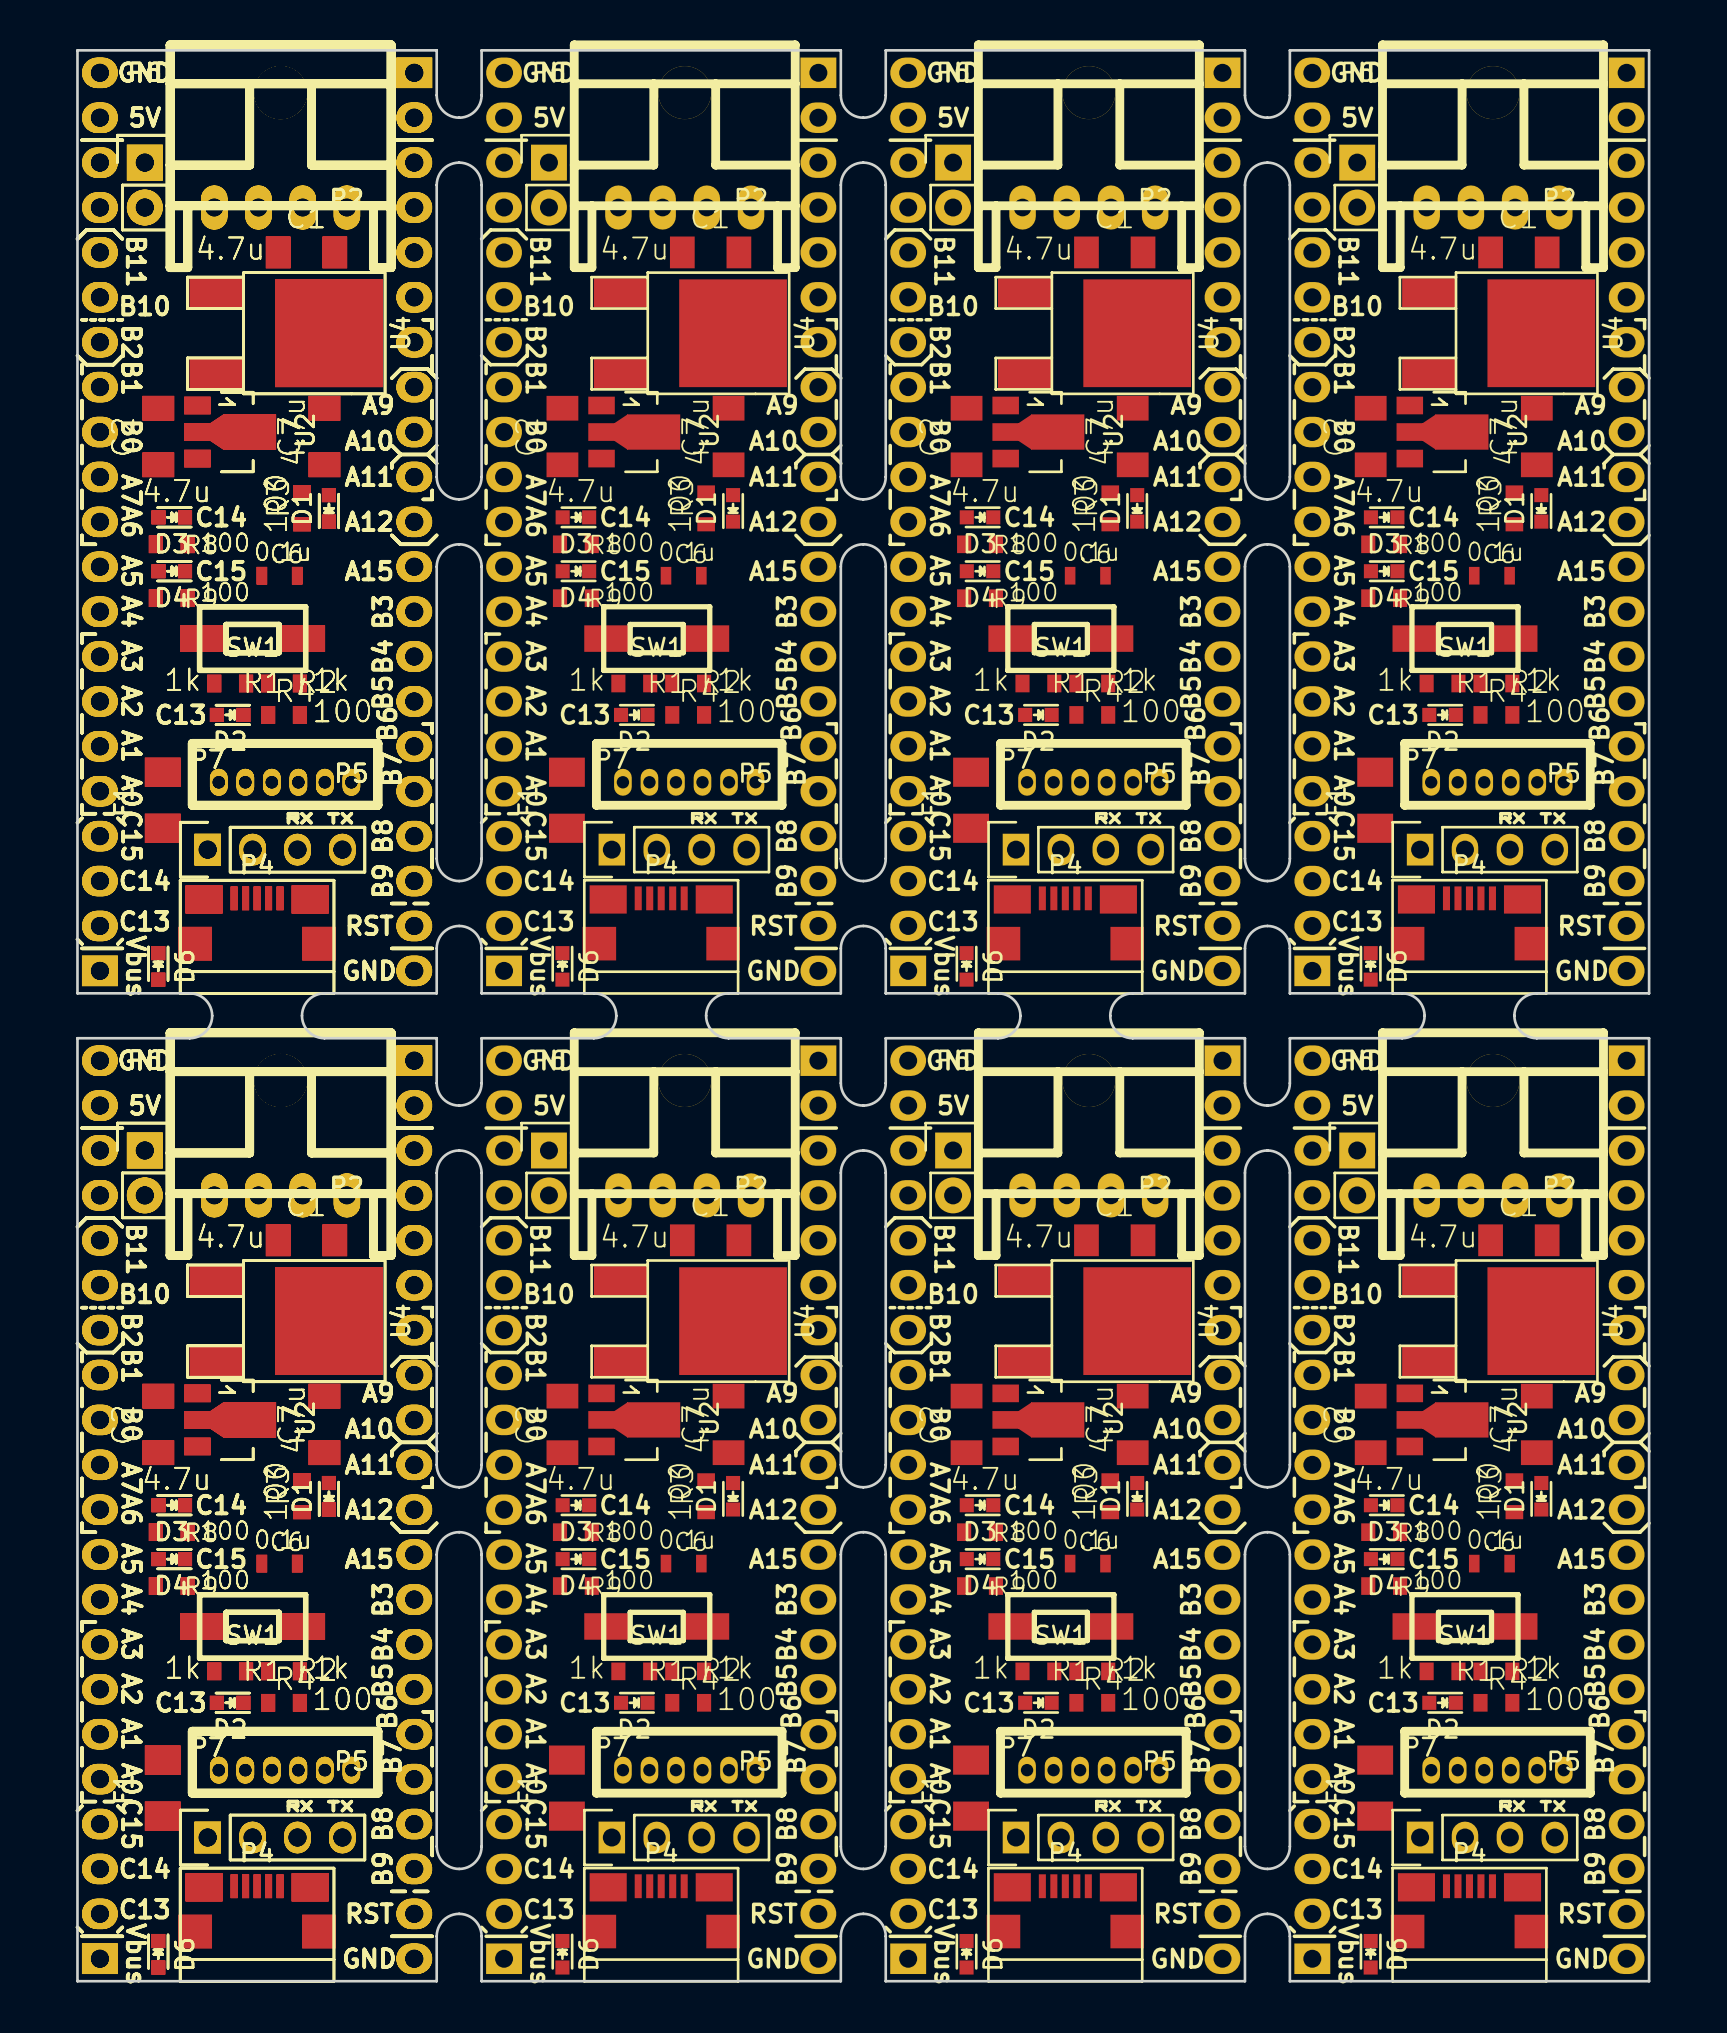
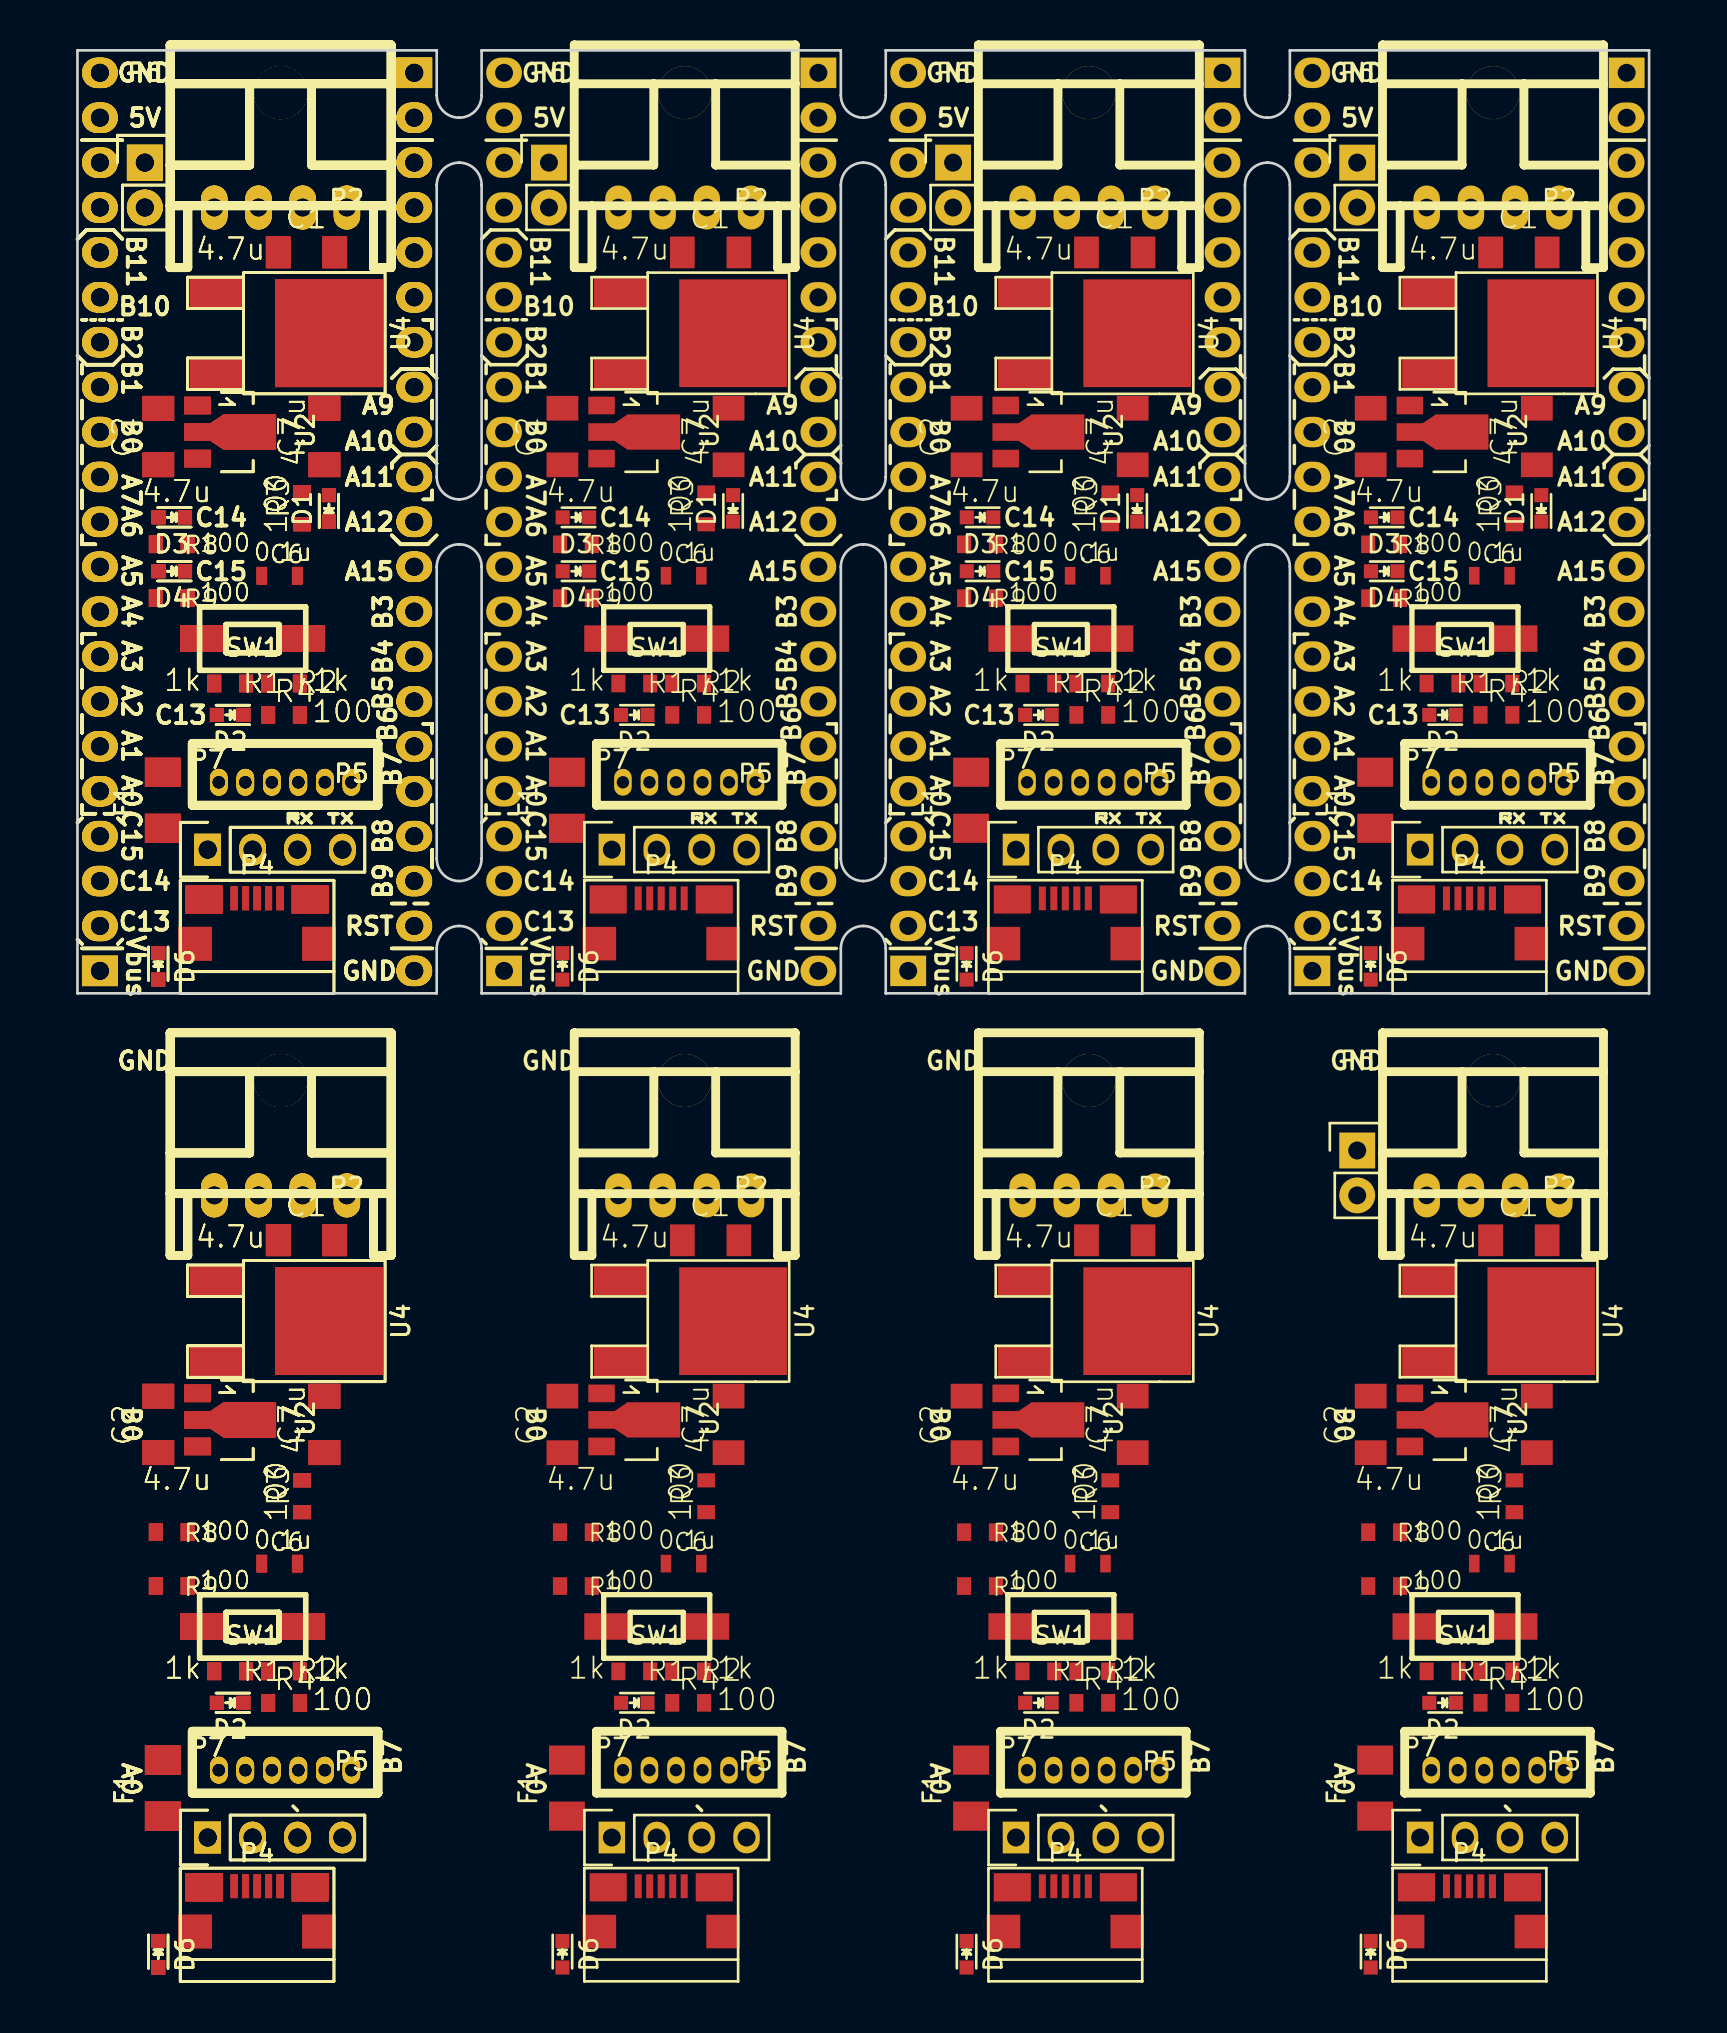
board edge: (189, 993) (203, 997) (211, 1009) (211, 1018) (209, 1027) (198, 1036) (189, 1038) (77, 1038) (77, 1981) (436, 1981) (437, 1930) (445, 1918) (459, 1913) (472, 1918) (480, 1930) (481, 1981) (840, 1981) (841, 1930) (849, 1918) (863, 1913) (876, 1918) (884, 1930) (885, 1981) (1244, 1981) (1245, 1930) (1253, 1918) (1267, 1913) (1281, 1918) (1289, 1930) (1289, 1981) (1649, 1981) (1649, 1038) (1536, 1038) (1528, 1036) (1517, 1027) (1514, 1012) (1517, 1004) (1523, 997) (1536, 993) -> (189, 993) (324, 993)
board edge: (324, 993) (310, 997) (302, 1009) (302, 1021) (310, 1033) (324, 1038) (436, 1038) (437, 1088) (445, 1100) (459, 1105) (472, 1100) (480, 1088) (481, 1038) (593, 1038) (607, 1033) (615, 1021) (615, 1009) (607, 997) (593, 993) -> (728, 993) (593, 993)
board edge: (728, 993) (714, 997) (706, 1009) (706, 1021) (714, 1033) (728, 1038) (840, 1038) (841, 1088) (849, 1100) (863, 1105) (876, 1100) (884, 1088) (885, 1038) (997, 1038) (1011, 1033) (1019, 1021) (1019, 1009) (1011, 997) (997, 993) -> (1132, 993) (997, 993)
board edge: (1132, 993) (1119, 997) (1111, 1009) (1111, 1021) (1119, 1033) (1132, 1038) (1244, 1038) (1245, 1088) (1253, 1100) (1267, 1105) (1281, 1100) (1289, 1088) (1289, 1038) (1402, 1038) (1415, 1033) (1423, 1021) (1423, 1009) (1415, 997) (1402, 993) -> (1536, 993) (1402, 993)
text: 5V (145, 1104) -> none
text: 5V (549, 1104) -> none
text: 5V (953, 1104) -> none
text: 5V (1358, 1104) -> none
line: (81, 1128) (122, 1128) -> none
line: (391, 1128) (432, 1128) -> none
line: (486, 1128) (526, 1128) -> none
line: (795, 1128) (836, 1128) -> none
line: (890, 1128) (930, 1128) -> none
line: (1200, 1128) (1240, 1128) -> none
line: (1294, 1128) (1334, 1128) -> none
line: (1604, 1128) (1644, 1128) -> none
board edge: (459, 1150) (450, 1152) (443, 1157) (438, 1164) (436, 1172) (436, 1467) (439, 1476) (445, 1482) (459, 1487) (467, 1485) (475, 1480) (479, 1473) (481, 1464) (481, 1170) (478, 1161) (472, 1155) (459, 1150) -> none
board edge: (863, 1150) (854, 1152) (847, 1157) (842, 1164) (840, 1172) (841, 1467) (843, 1476) (849, 1482) (863, 1487) (871, 1485) (879, 1480) (884, 1473) (885, 1464) (885, 1170) (882, 1161) (876, 1155) (863, 1150) -> none
board edge: (1267, 1150) (1258, 1152) (1251, 1157) (1246, 1164) (1244, 1172) (1245, 1467) (1247, 1476) (1253, 1482) (1267, 1487) (1276, 1485) (1283, 1480) (1288, 1473) (1289, 1464) (1289, 1170) (1286, 1161) (1281, 1155) (1267, 1150) -> none
part: (144, 1170) -> none
part: (548, 1170) -> none
part: (953, 1170) -> none
line: (77, 1226) (86, 1217) (113, 1217) (122, 1226) -> none
line: (481, 1226) (490, 1217) (517, 1217) (526, 1226) -> none
line: (885, 1226) (894, 1217) (921, 1217) (930, 1226) -> none
line: (1289, 1226) (1298, 1217) (1325, 1217) (1334, 1226) -> none
text: B11 (136, 1249) -> none
text: B11 (540, 1249) -> none
text: B11 (944, 1249) -> none
text: B11 (1348, 1249) -> none
text: B10 (145, 1293) -> none
text: B10 (549, 1293) -> none
text: B10 (953, 1293) -> none
text: B10 (1357, 1293) -> none
line: (81, 1307) (86, 1307) -> none
line: (90, 1307) (95, 1307) -> none
line: (99, 1307) (104, 1307) -> none
line: (108, 1307) (113, 1307) -> none
line: (117, 1307) (122, 1307) -> none
line: (423, 1307) (432, 1307) (432, 1316) -> none
line: (486, 1307) (490, 1307) -> none
line: (495, 1307) (499, 1307) -> none
line: (504, 1307) (508, 1307) -> none
line: (513, 1307) (517, 1307) -> none
line: (522, 1307) (526, 1307) -> none
line: (827, 1307) (836, 1307) (836, 1316) -> none
line: (890, 1307) (894, 1307) -> none
line: (899, 1307) (903, 1307) -> none
line: (908, 1307) (912, 1307) -> none
line: (917, 1307) (921, 1307) -> none
line: (926, 1307) (930, 1307) -> none
line: (1231, 1307) (1240, 1307) (1240, 1316) -> none
line: (1294, 1307) (1298, 1307) -> none
line: (1303, 1307) (1307, 1307) -> none
line: (1312, 1307) (1316, 1307) -> none
line: (1321, 1307) (1325, 1307) -> none
line: (1330, 1307) (1334, 1307) -> none
line: (1635, 1307) (1644, 1307) (1644, 1316) -> none
text: B2 (132, 1330) -> none
text: B2 (536, 1330) -> none
text: B2 (940, 1330) -> none
text: B2 (1344, 1330) -> none
line: (77, 1343) (86, 1352) (113, 1352) (122, 1343) -> none
line: (432, 1343) (432, 1361) -> none
line: (481, 1343) (490, 1352) (517, 1352) (526, 1343) -> none
line: (836, 1343) (836, 1361) -> none
line: (885, 1343) (894, 1352) (921, 1352) (930, 1343) -> none
line: (1240, 1343) (1240, 1361) -> none
line: (1289, 1343) (1298, 1352) (1325, 1352) (1334, 1343) -> none
line: (1644, 1343) (1644, 1361) -> none
line: (81, 1352) (81, 1361) -> none
line: (486, 1352) (486, 1361) -> none
line: (890, 1352) (890, 1361) -> none
line: (1294, 1352) (1294, 1361) -> none
text: B1 (132, 1366) -> none
line: (391, 1366) (400, 1357) (427, 1357) (436, 1366) -> none
text: B1 (536, 1366) -> none
line: (795, 1366) (804, 1357) (831, 1357) (840, 1366) -> none
text: B1 (940, 1366) -> none
line: (1200, 1366) (1209, 1357) (1235, 1357) (1244, 1366) -> none
text: B1 (1344, 1366) -> none
line: (1604, 1366) (1613, 1357) (1640, 1357) (1649, 1366) -> none
line: (81, 1388) (81, 1406) -> none
line: (432, 1388) (432, 1406) -> none
line: (486, 1388) (486, 1406) -> none
line: (836, 1388) (836, 1406) -> none
line: (890, 1388) (890, 1406) -> none
line: (1240, 1388) (1240, 1406) -> none
line: (1294, 1388) (1294, 1406) -> none
line: (1644, 1388) (1644, 1406) -> none
text: A9 (377, 1392) -> none
text: A9 (781, 1392) -> none
text: A9 (1185, 1392) -> none
text: A9 (1589, 1392) -> none
text: A10 (368, 1428) -> none
text: A10 (772, 1428) -> none
text: A10 (1176, 1428) -> none
text: A10 (1580, 1428) -> none
line: (81, 1433) (81, 1451) -> none
line: (391, 1433) (400, 1442) -> none
line: (436, 1433) (427, 1442) -> none
line: (486, 1433) (486, 1451) -> none
line: (795, 1433) (804, 1442) -> none
line: (840, 1433) (831, 1442) -> none
line: (890, 1433) (890, 1451) -> none
line: (1200, 1433) (1209, 1442) -> none
line: (1244, 1433) (1235, 1442) -> none
line: (1294, 1433) (1294, 1451) -> none
line: (1604, 1433) (1613, 1442) -> none
line: (1649, 1433) (1640, 1442) -> none
line: (400, 1442) (427, 1442) -> none
line: (400, 1442) (391, 1451) (391, 1455) -> none
line: (427, 1442) (436, 1451) -> none
line: (804, 1442) (831, 1442) -> none
line: (804, 1442) (795, 1451) (795, 1455) -> none
line: (831, 1442) (840, 1451) -> none
line: (1209, 1442) (1235, 1442) -> none
line: (1209, 1442) (1200, 1451) (1200, 1455) -> none
line: (1235, 1442) (1244, 1451) -> none
line: (1613, 1442) (1640, 1442) -> none
line: (1613, 1442) (1604, 1451) (1604, 1455) -> none
line: (1640, 1442) (1649, 1451) -> none
text: A11 (368, 1464) -> none
text: A11 (772, 1464) -> none
text: A11 (1176, 1464) -> none
text: A11 (1580, 1464) -> none
text: A7 (132, 1477) -> none
text: A7 (536, 1477) -> none
text: A7 (940, 1477) -> none
text: A7 (1344, 1477) -> none
line: (81, 1478) (81, 1496) -> none
line: (432, 1478) (432, 1487) (423, 1487) -> none
line: (486, 1478) (486, 1496) -> none
line: (836, 1478) (836, 1487) (827, 1487) -> none
line: (890, 1478) (890, 1496) -> none
line: (1240, 1478) (1240, 1487) (1231, 1487) -> none
line: (1294, 1478) (1294, 1496) -> none
line: (1644, 1478) (1644, 1487) (1635, 1487) -> none
D1: (328, 1496) -> none
D1: (733, 1496) -> none
D1: (1137, 1496) -> none
D1: (1541, 1496) -> none
text: C14 (221, 1504) -> none
text: C14 (625, 1504) -> none
text: C14 (1029, 1504) -> none
text: C14 (1433, 1504) -> none
D3: (172, 1505) -> none
D3: (576, 1505) -> none
D3: (980, 1505) -> none
D3: (1384, 1505) -> none
text: A6 (132, 1508) -> none
text: A6 (536, 1508) -> none
text: A6 (940, 1508) -> none
text: A6 (1344, 1508) -> none
part: (99, 1509) -> none
text: A12 (368, 1509) -> none
part: (414, 1509) -> none
part: (504, 1509) -> none
text: A12 (772, 1509) -> none
part: (818, 1509) -> none
part: (908, 1509) -> none
text: A12 (1176, 1509) -> none
part: (1222, 1509) -> none
part: (1312, 1509) -> none
text: A12 (1580, 1509) -> none
part: (1626, 1509) -> none
line: (81, 1523) (81, 1532) (95, 1532) -> none
line: (391, 1523) (400, 1532) (427, 1532) (436, 1523) -> none
line: (486, 1523) (486, 1532) (499, 1532) -> none
line: (795, 1523) (804, 1532) (831, 1532) (840, 1523) -> none
line: (890, 1523) (890, 1532) (903, 1532) -> none
line: (1200, 1523) (1209, 1532) (1235, 1532) (1244, 1523) -> none
line: (1294, 1523) (1294, 1532) (1307, 1532) -> none
line: (1604, 1523) (1613, 1532) (1640, 1532) (1649, 1523) -> none
board edge: (459, 1532) (450, 1533) (443, 1538) (438, 1546) (436, 1554) (436, 1849) (439, 1857) (445, 1864) (459, 1868) (467, 1867) (475, 1862) (479, 1855) (481, 1846) (481, 1551) (478, 1543) (472, 1536) (459, 1532) -> none
board edge: (863, 1532) (854, 1533) (847, 1538) (842, 1546) (840, 1554) (841, 1849) (843, 1857) (849, 1864) (863, 1868) (871, 1867) (879, 1862) (884, 1855) (885, 1846) (885, 1551) (882, 1543) (876, 1536) (863, 1532) -> none
board edge: (1267, 1532) (1258, 1533) (1251, 1538) (1246, 1546) (1244, 1554) (1245, 1849) (1247, 1857) (1253, 1864) (1267, 1868) (1276, 1867) (1283, 1862) (1288, 1855) (1289, 1846) (1289, 1551) (1286, 1543) (1281, 1536) (1267, 1532) -> none
text: A5 (132, 1558) -> none
text: C15 (221, 1558) -> none
text: A15 (368, 1558) -> none
text: A5 (536, 1558) -> none
text: C15 (625, 1558) -> none
text: A15 (772, 1558) -> none
text: A5 (940, 1558) -> none
text: C15 (1029, 1558) -> none
text: A15 (1176, 1558) -> none
text: A5 (1344, 1558) -> none
text: C15 (1433, 1558) -> none
text: A15 (1580, 1558) -> none
D4: (172, 1559) -> none
D4: (576, 1559) -> none
D4: (980, 1559) -> none
D4: (1384, 1559) -> none
text: A4 (132, 1599) -> none
text: B3 (382, 1599) -> none
text: A4 (536, 1599) -> none
text: B3 (786, 1599) -> none
text: A4 (940, 1599) -> none
text: B3 (1190, 1599) -> none
text: A4 (1344, 1599) -> none
text: B3 (1594, 1599) -> none
line: (95, 1621) (81, 1621) (81, 1630) -> none
line: (499, 1621) (486, 1621) (486, 1630) -> none
line: (903, 1621) (890, 1621) (890, 1630) -> none
line: (1307, 1621) (1294, 1621) (1294, 1630) -> none
text: A3 (132, 1643) -> none
text: B4 (381, 1643) -> none
text: A3 (536, 1643) -> none
text: B4 (785, 1643) -> none
text: A3 (940, 1643) -> none
text: B4 (1189, 1643) -> none
text: A3 (1344, 1643) -> none
text: B4 (1594, 1643) -> none
line: (81, 1657) (81, 1675) -> none
line: (486, 1657) (486, 1675) -> none
line: (890, 1657) (890, 1675) -> none
line: (1294, 1657) (1294, 1675) -> none
text: B5 (382, 1679) -> none
text: B5 (786, 1679) -> none
text: B5 (1190, 1679) -> none
text: B5 (1594, 1679) -> none
text: A2 (132, 1688) -> none
text: A2 (536, 1688) -> none
text: A2 (940, 1688) -> none
text: A2 (1344, 1688) -> none
line: (81, 1702) (81, 1720) -> none
text: C13 (180, 1702) -> none
line: (486, 1702) (486, 1720) -> none
text: C13 (584, 1702) -> none
line: (890, 1702) (890, 1720) -> none
text: C13 (989, 1702) -> none
line: (1294, 1702) (1294, 1720) -> none
text: C13 (1393, 1702) -> none
text: B6 (386, 1711) -> none
line: (423, 1711) (432, 1711) (432, 1720) -> none
text: B6 (790, 1711) -> none
line: (827, 1711) (836, 1711) (836, 1720) -> none
text: B6 (1194, 1711) -> none
line: (1231, 1711) (1240, 1711) (1240, 1720) -> none
text: B6 (1599, 1711) -> none
line: (1635, 1711) (1644, 1711) (1644, 1720) -> none
text: A1 (132, 1733) -> none
text: A1 (536, 1733) -> none
text: A1 (940, 1733) -> none
text: A1 (1344, 1733) -> none
line: (81, 1747) (81, 1765) -> none
line: (432, 1747) (432, 1765) -> none
line: (486, 1747) (486, 1765) -> none
line: (836, 1747) (836, 1765) -> none
line: (890, 1747) (890, 1765) -> none
line: (1240, 1747) (1240, 1765) -> none
line: (1294, 1747) (1294, 1765) -> none
line: (1644, 1747) (1644, 1765) -> none
line: (81, 1792) (81, 1801) (95, 1801) -> none
line: (432, 1792) (432, 1810) -> none
line: (486, 1792) (486, 1801) (499, 1801) -> none
line: (836, 1792) (836, 1810) -> none
line: (890, 1792) (890, 1801) (903, 1801) -> none
line: (1240, 1792) (1240, 1810) -> none
line: (1294, 1792) (1294, 1801) (1307, 1801) -> none
line: (1644, 1792) (1644, 1810) -> none
line: (104, 1801) (113, 1801) -> none
line: (301, 1801) (310, 1810) -> none
line: (310, 1801) (301, 1810) -> none
line: (328, 1801) (337, 1801) -> none
line: (333, 1801) (333, 1810) -> none
line: (342, 1801) (351, 1810) -> none
line: (351, 1801) (342, 1810) -> none
line: (508, 1801) (517, 1801) -> none
line: (706, 1801) (715, 1810) -> none
line: (715, 1801) (706, 1810) -> none
line: (733, 1801) (742, 1801) -> none
line: (737, 1801) (737, 1810) -> none
line: (746, 1801) (755, 1810) -> none
line: (755, 1801) (746, 1810) -> none
line: (912, 1801) (921, 1801) -> none
line: (1110, 1801) (1119, 1810) -> none
line: (1119, 1801) (1110, 1810) -> none
line: (1137, 1801) (1146, 1801) -> none
line: (1141, 1801) (1141, 1810) -> none
line: (1150, 1801) (1159, 1810) -> none
line: (1159, 1801) (1150, 1810) -> none
line: (1316, 1801) (1325, 1801) -> none
line: (1514, 1801) (1523, 1810) -> none
line: (1523, 1801) (1514, 1810) -> none
line: (1541, 1801) (1550, 1801) -> none
line: (1545, 1801) (1545, 1810) -> none
line: (1554, 1801) (1563, 1810) -> none
line: (1563, 1801) (1554, 1810) -> none
line: (81, 1806) (77, 1810) -> none
line: (117, 1806) (122, 1810) -> none
line: (288, 1806) (297, 1806) (297, 1801) (288, 1801) (288, 1810) -> none
line: (486, 1806) (481, 1810) -> none
line: (522, 1806) (526, 1810) -> none
line: (692, 1806) (701, 1806) (701, 1801) (692, 1801) (692, 1810) -> none
line: (890, 1806) (885, 1810) -> none
line: (926, 1806) (930, 1810) -> none
line: (1096, 1806) (1105, 1806) (1105, 1801) (1096, 1801) (1096, 1810) -> none
line: (1294, 1806) (1289, 1810) -> none
line: (1330, 1806) (1334, 1810) -> none
line: (1500, 1806) (1509, 1806) (1509, 1801) (1500, 1801) (1500, 1810) -> none
text: B8 (382, 1823) -> none
text: B8 (786, 1823) -> none
text: B8 (1190, 1823) -> none
text: B8 (1594, 1823) -> none
text: C15 (132, 1824) -> none
text: C15 (536, 1824) -> none
text: C15 (940, 1824) -> none
text: C15 (1344, 1824) -> none
line: (432, 1837) (432, 1855) -> none
line: (836, 1837) (836, 1855) -> none
line: (1240, 1837) (1240, 1855) -> none
line: (1644, 1837) (1644, 1855) -> none
text: C14 (145, 1867) -> none
text: C14 (549, 1867) -> none
text: C14 (953, 1867) -> none
text: C14 (1357, 1867) -> none
text: B9 (382, 1868) -> none
text: B9 (786, 1868) -> none
text: B9 (1190, 1868) -> none
text: B9 (1594, 1868) -> none
line: (391, 1891) (405, 1891) -> none
line: (414, 1891) (427, 1891) -> none
line: (795, 1891) (809, 1891) -> none
line: (818, 1891) (831, 1891) -> none
line: (1200, 1891) (1213, 1891) -> none
line: (1222, 1891) (1235, 1891) -> none
line: (1604, 1891) (1617, 1891) -> none
line: (1626, 1891) (1640, 1891) -> none
text: C13 (144, 1908) -> none
text: C13 (548, 1908) -> none
text: C13 (953, 1908) -> none
text: C13 (1357, 1908) -> none
text: RST (370, 1913) -> none
text: RST (774, 1913) -> none
text: RST (1178, 1913) -> none
text: RST (1583, 1913) -> none
line: (77, 1927) (81, 1931) -> none
line: (122, 1927) (117, 1931) -> none
line: (481, 1927) (486, 1931) -> none
line: (526, 1927) (522, 1931) -> none
line: (885, 1927) (890, 1931) -> none
line: (930, 1927) (926, 1931) -> none
line: (1289, 1927) (1294, 1931) -> none
line: (1334, 1927) (1330, 1931) -> none
line: (81, 1936) (122, 1936) -> none
line: (391, 1936) (432, 1936) -> none
line: (486, 1936) (526, 1936) -> none
line: (795, 1936) (836, 1936) -> none
line: (890, 1936) (930, 1936) -> none
line: (1200, 1936) (1240, 1936) -> none
line: (1294, 1936) (1334, 1936) -> none
line: (1604, 1936) (1644, 1936) -> none
text: Vbus (136, 1953) -> none
text: Vbus (540, 1953) -> none
text: Vbus (944, 1953) -> none
text: Vbus (1348, 1953) -> none
text: GND (369, 1958) -> none
text: GND (773, 1958) -> none
text: GND (1177, 1958) -> none
text: GND (1581, 1958) -> none

